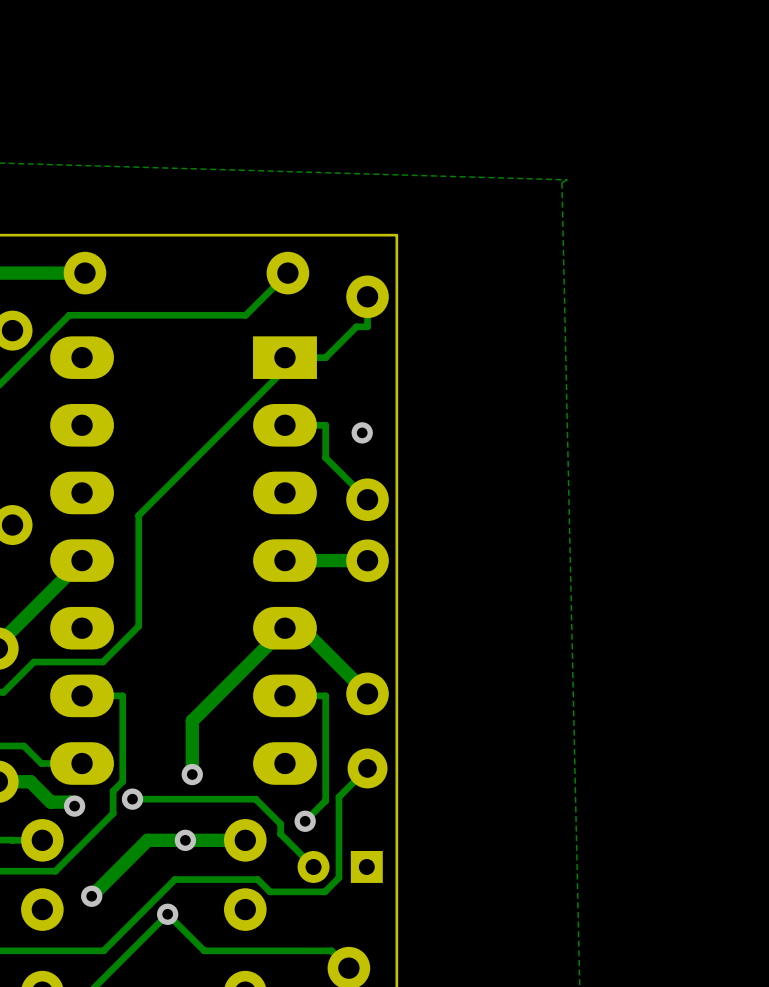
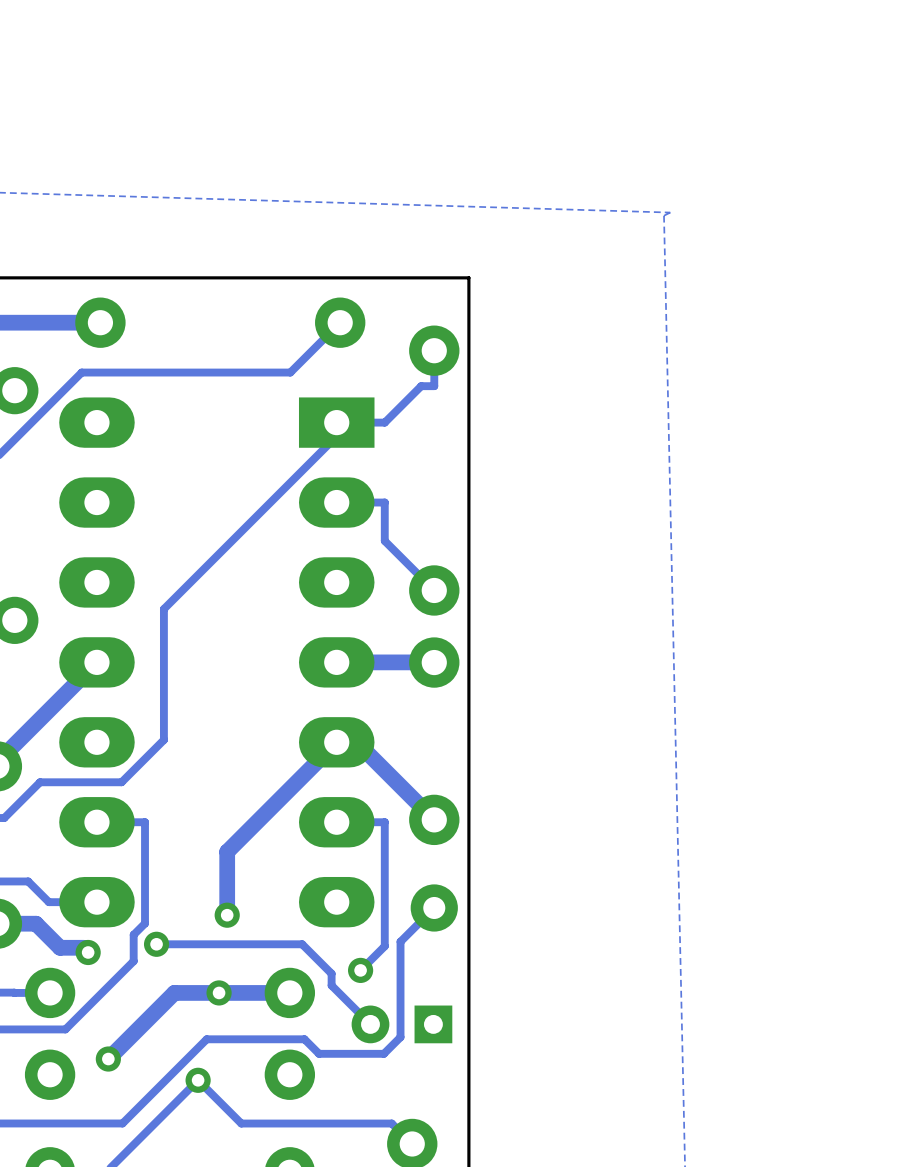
via: (362, 432) -> none

